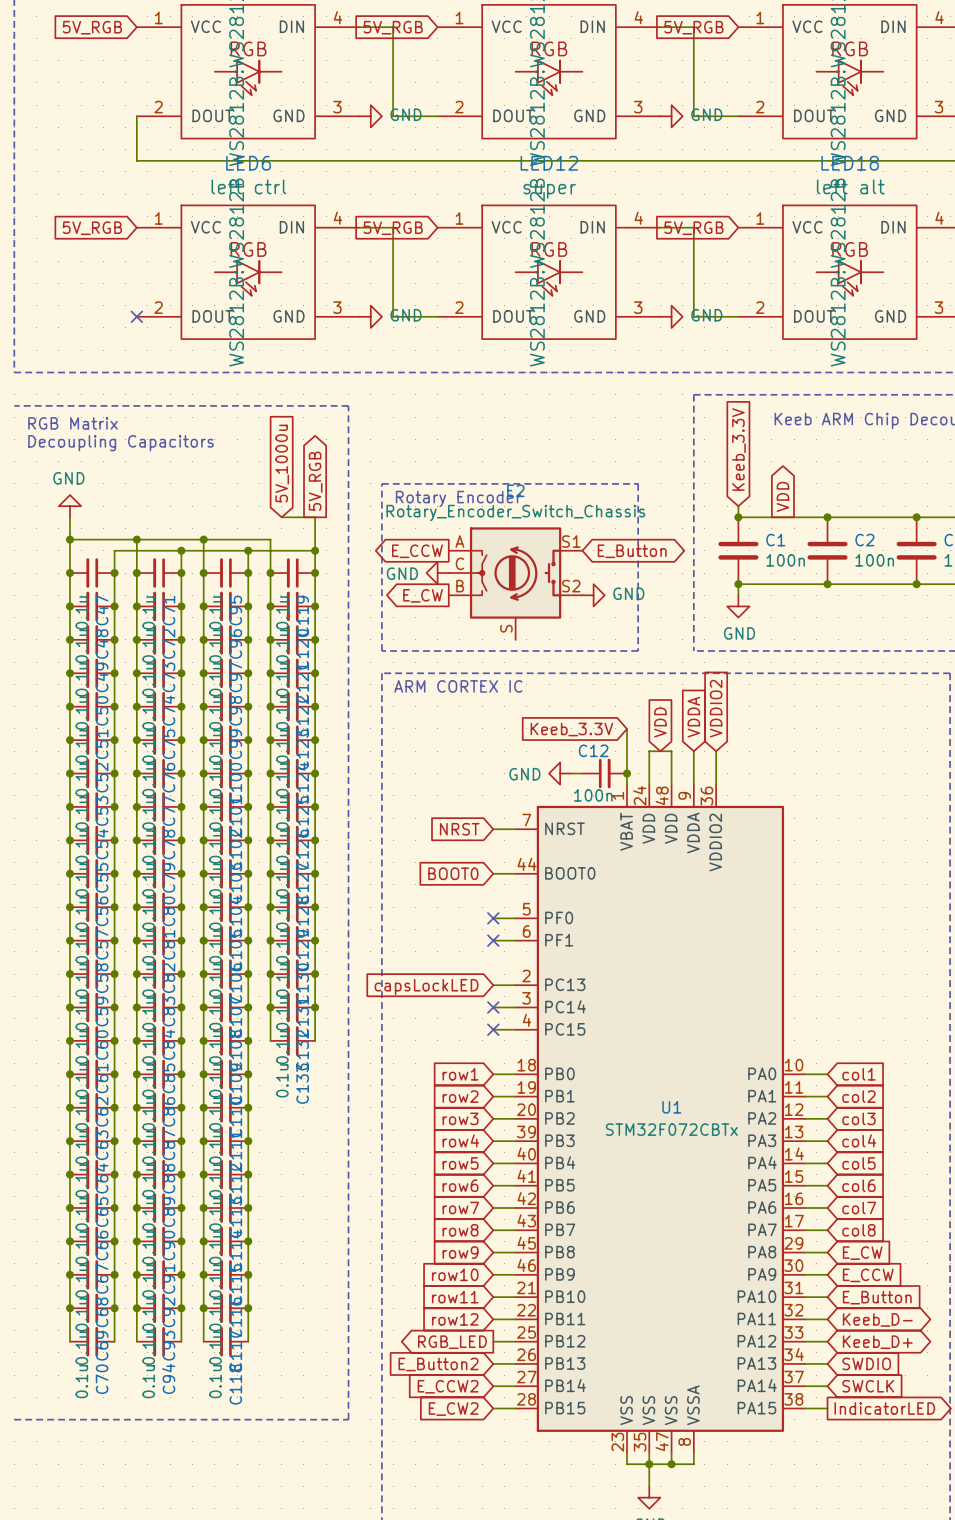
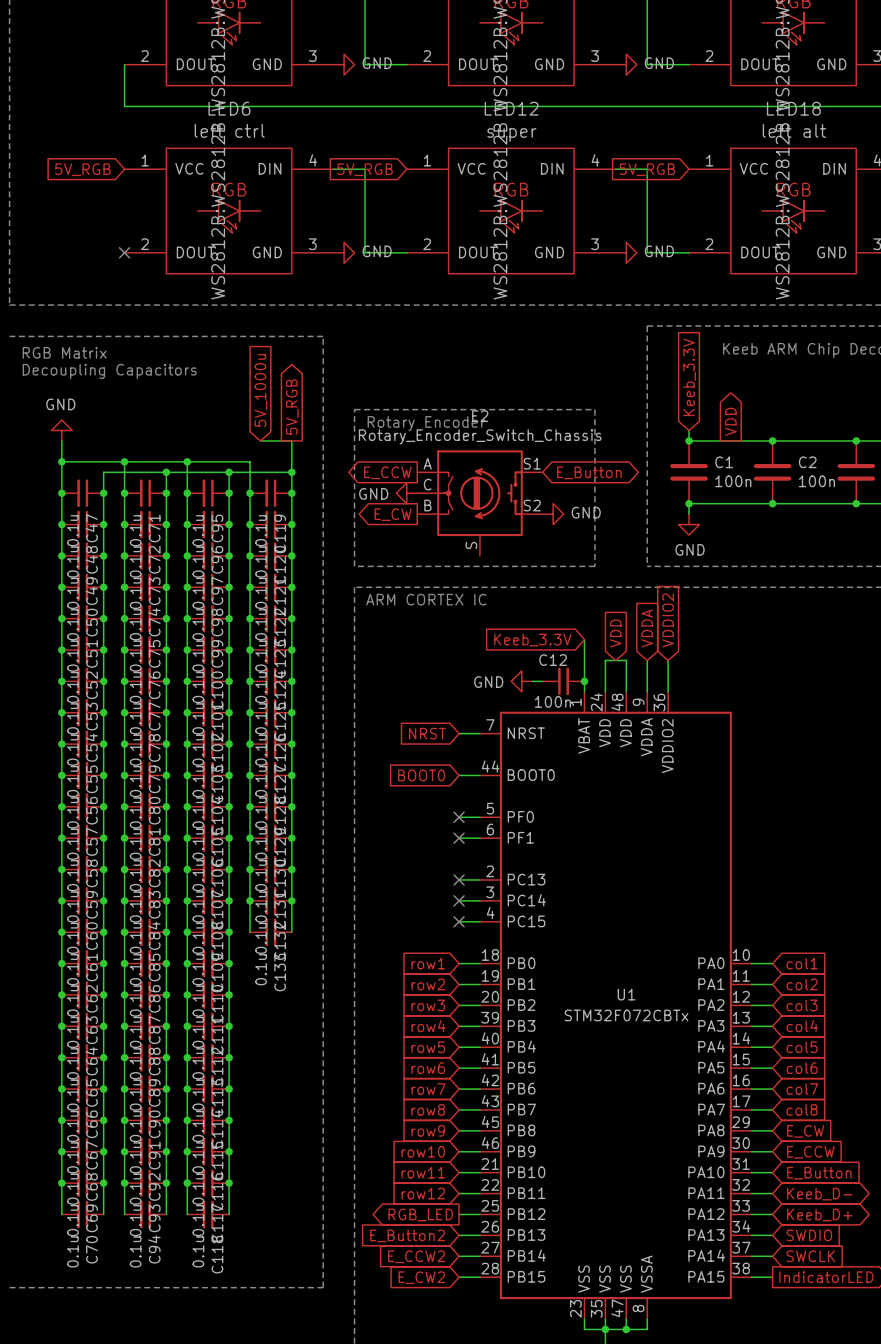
no-connect mark: none -> (459, 879)
global label: capsLockLED (426, 987) -> none

